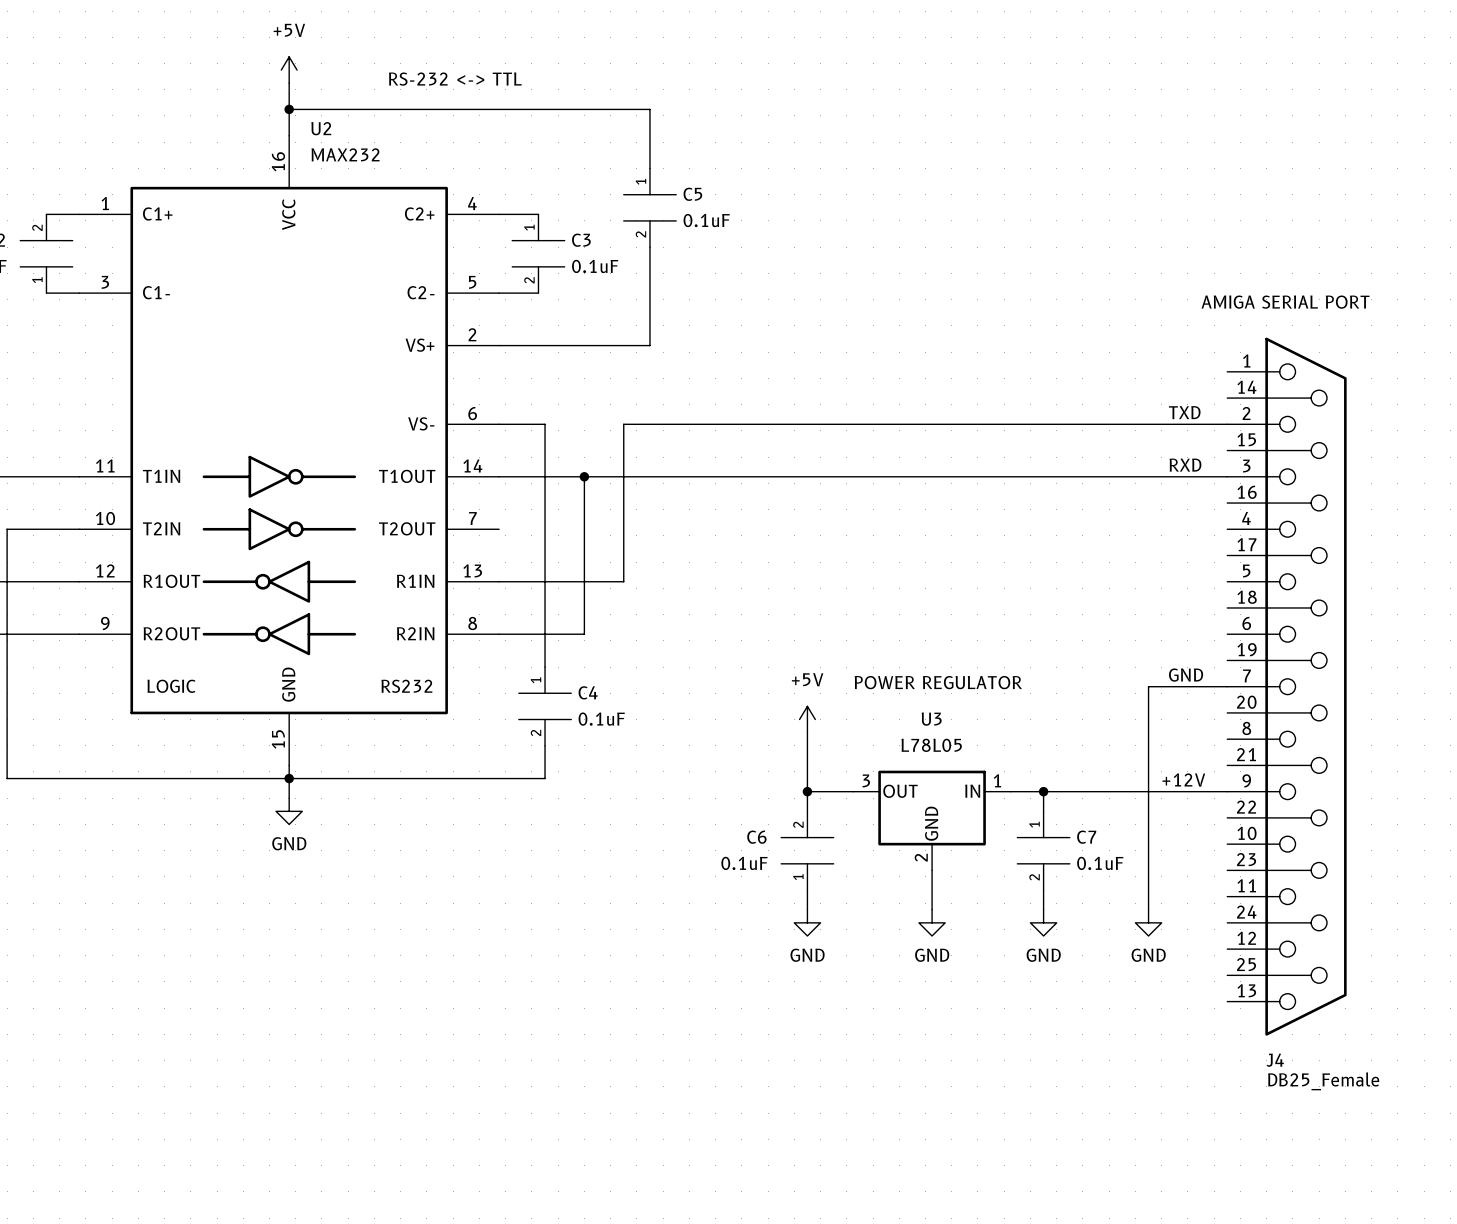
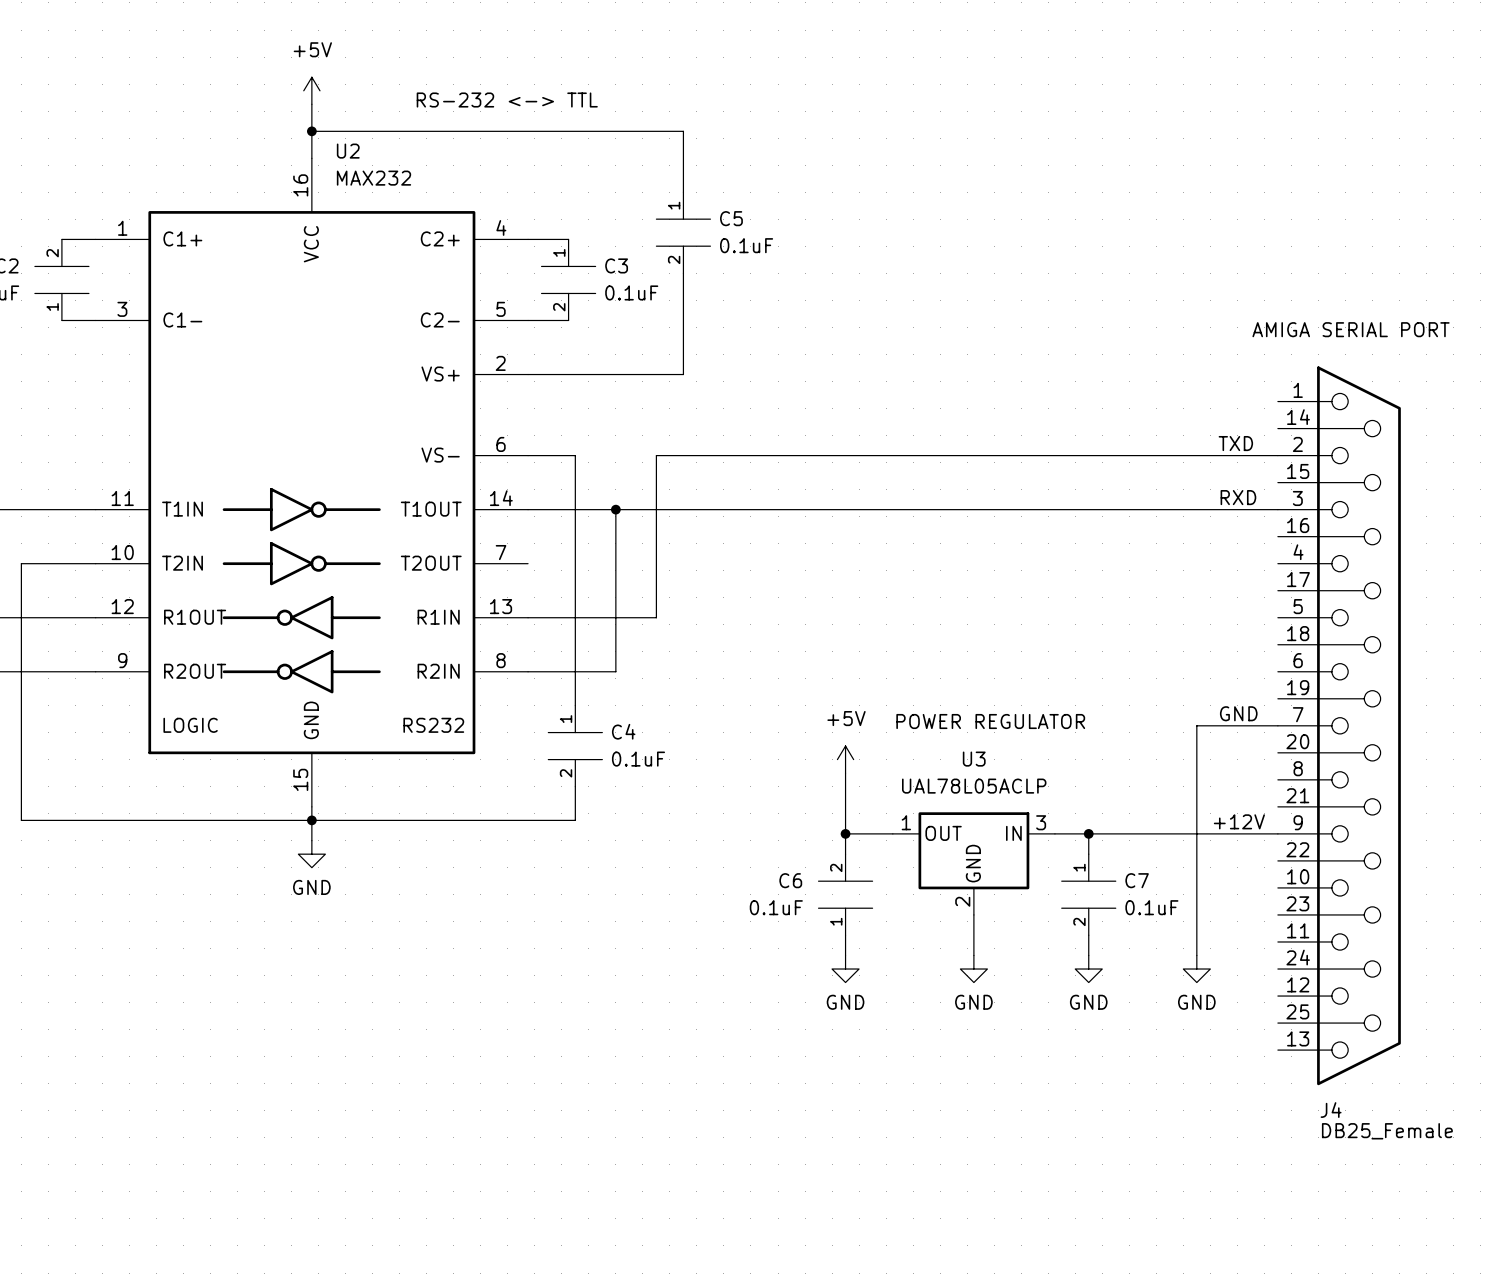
U3 value: L78L05 (931, 745) -> UAL78L05ACLP (974, 786)
U3 pin number: 3 (866, 780) -> 1 (906, 822)
U3 pin number: 1 (997, 780) -> 3 (1041, 822)

